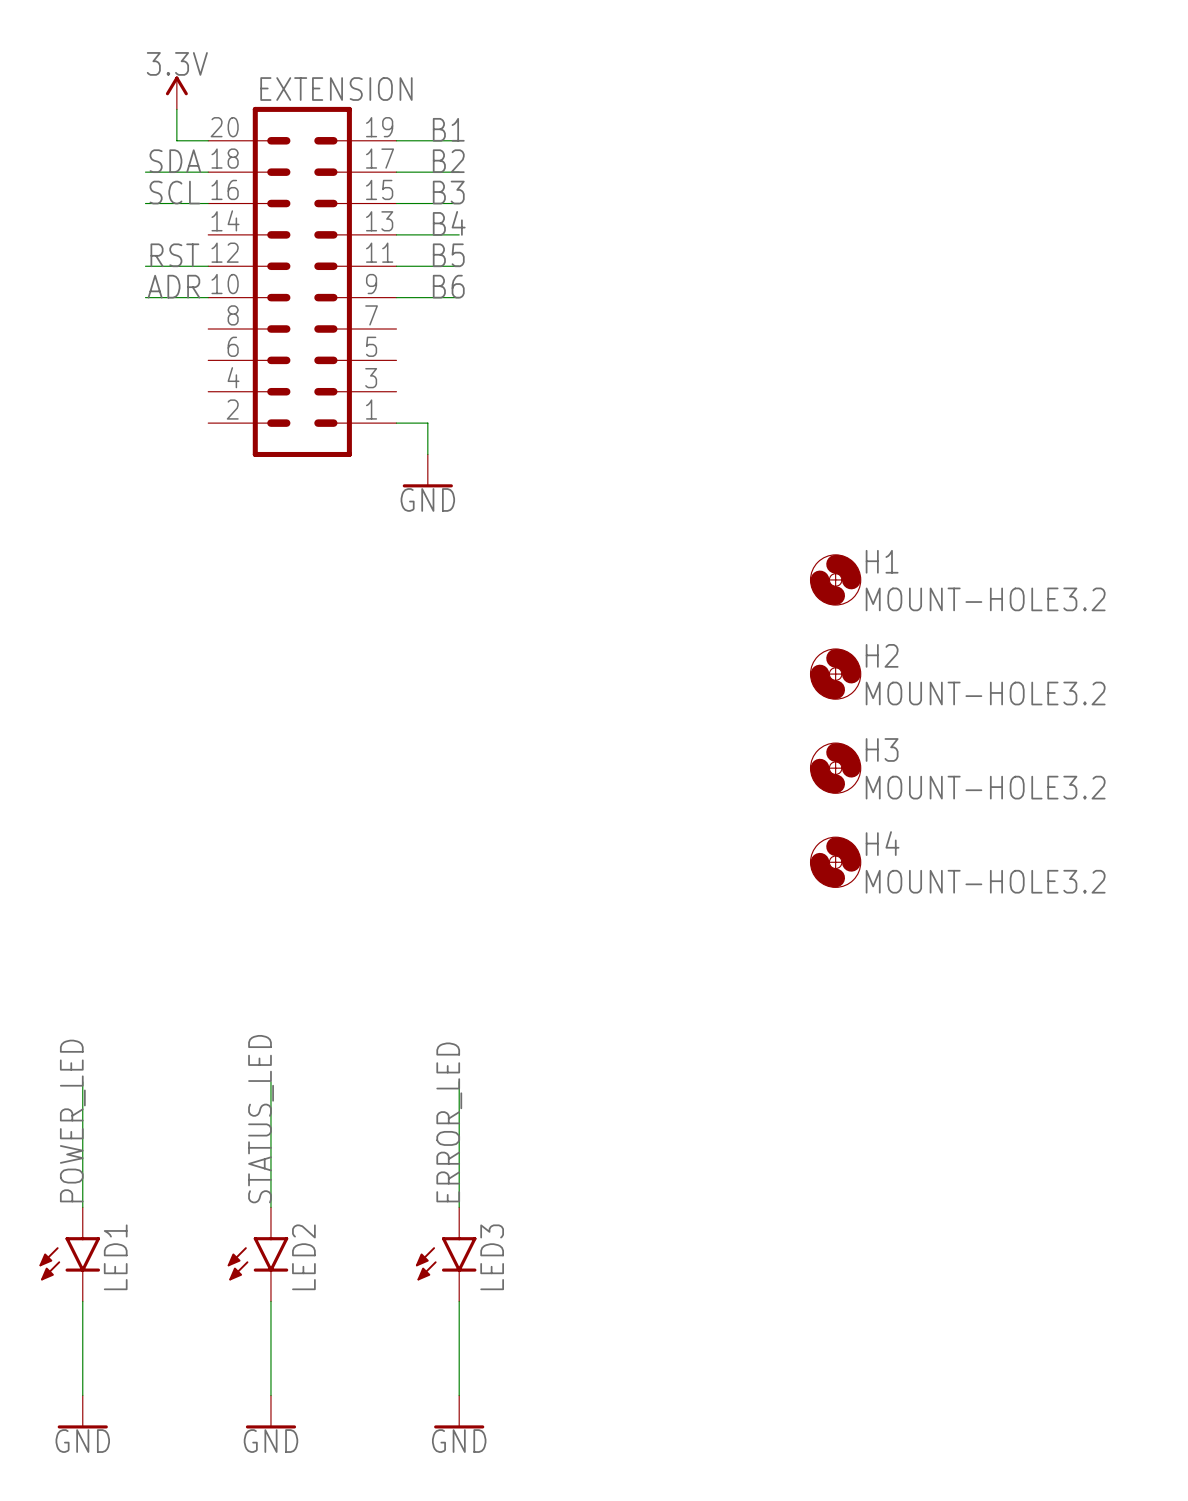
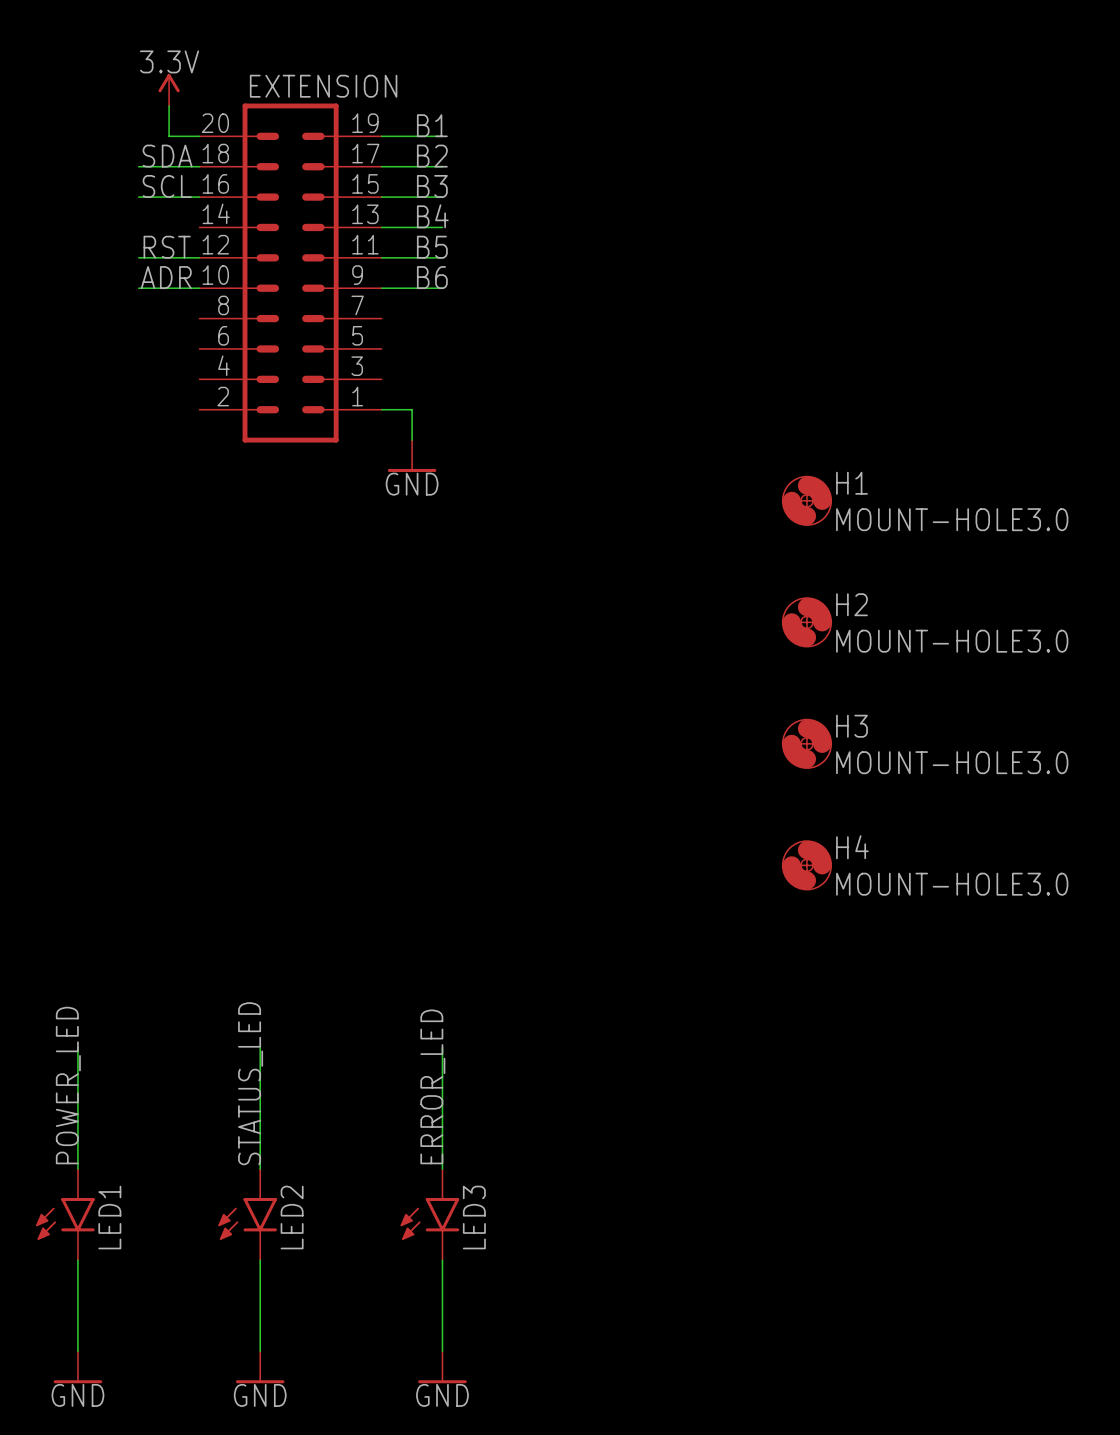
H1 position: (835, 579) -> (806, 500)
H1 value: MOUNT-HOLE3.2 (985, 599) -> MOUNT-HOLE3.0 (952, 519)
H2 position: (835, 674) -> (806, 622)
H2 value: MOUNT-HOLE3.2 (985, 693) -> MOUNT-HOLE3.0 (952, 641)
H3 value: MOUNT-HOLE3.2 (985, 787) -> MOUNT-HOLE3.0 (952, 762)
H4 position: (835, 862) -> (806, 865)
H4 value: MOUNT-HOLE3.2 (985, 881) -> MOUNT-HOLE3.0 (952, 884)

